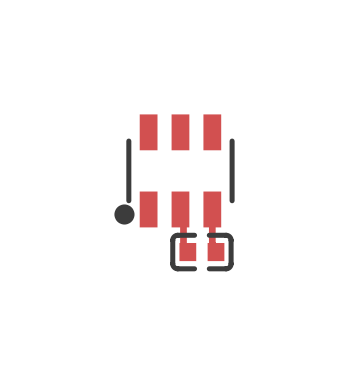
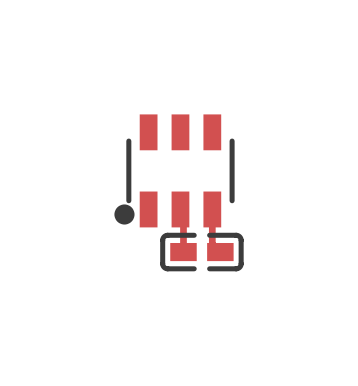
part footprint: [170, 232, 234, 272] -> [160, 232, 244, 272]

